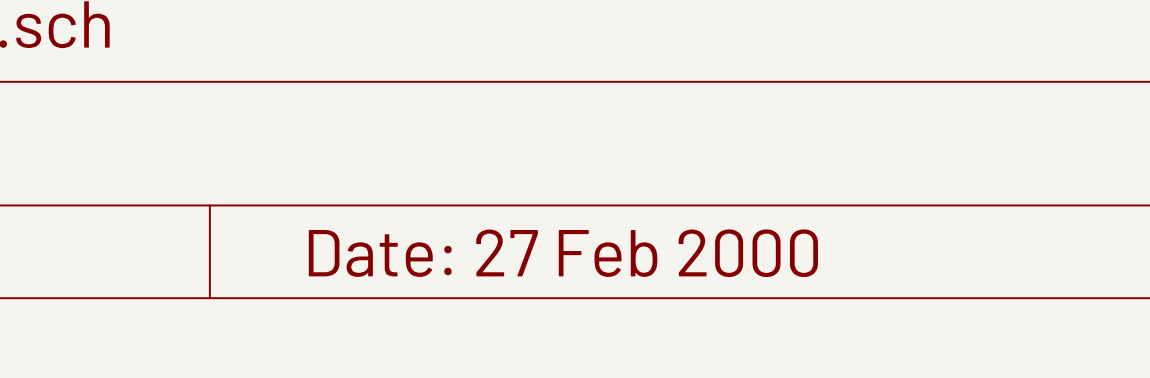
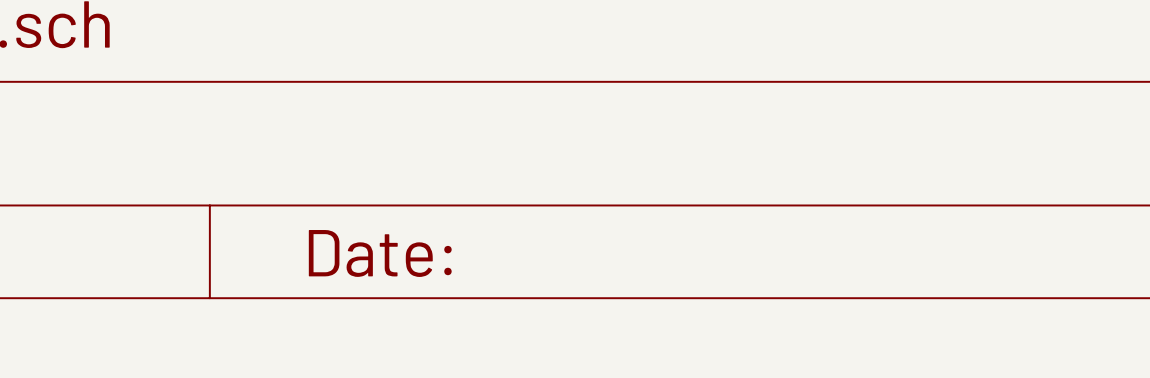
title block: Date: 27 Feb 2000 (563, 253) -> Date: (380, 253)

